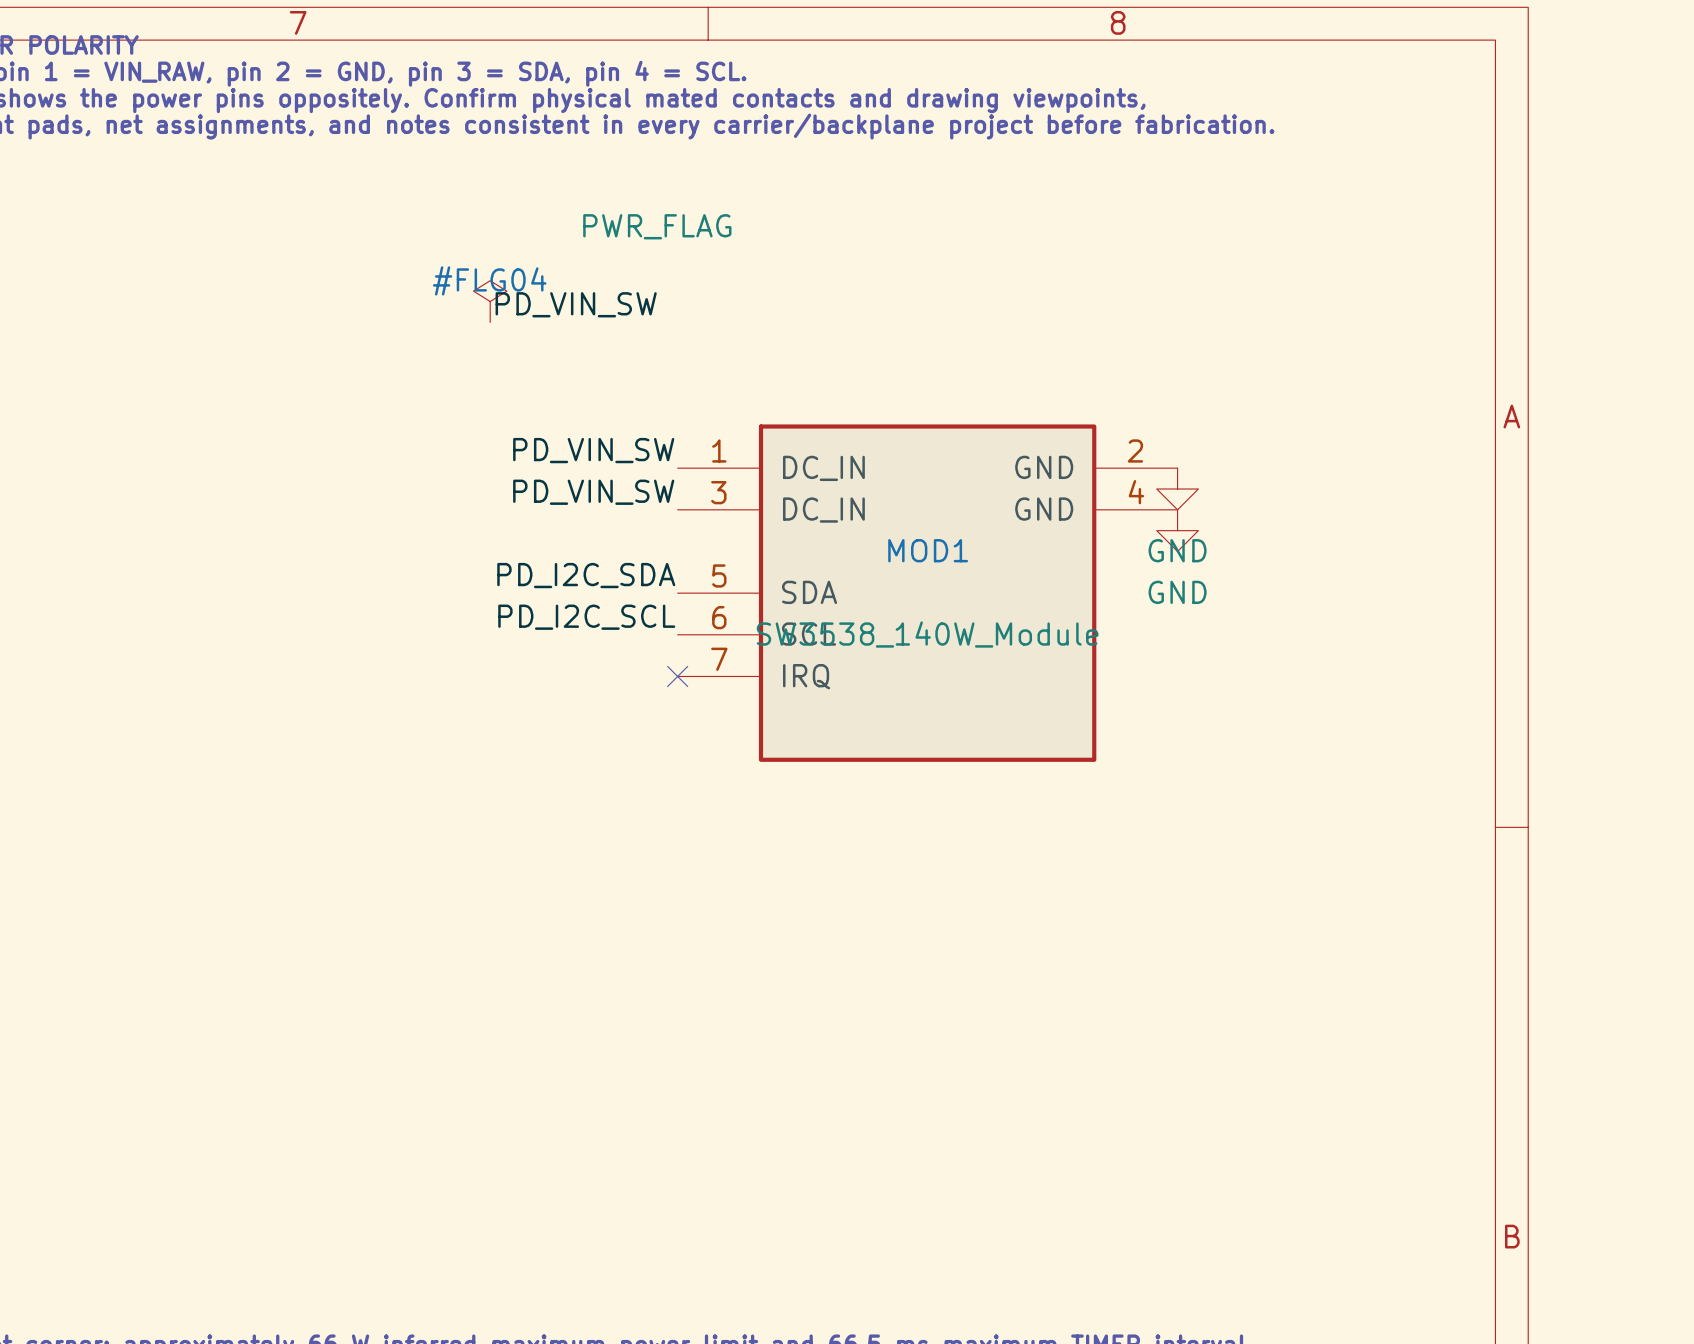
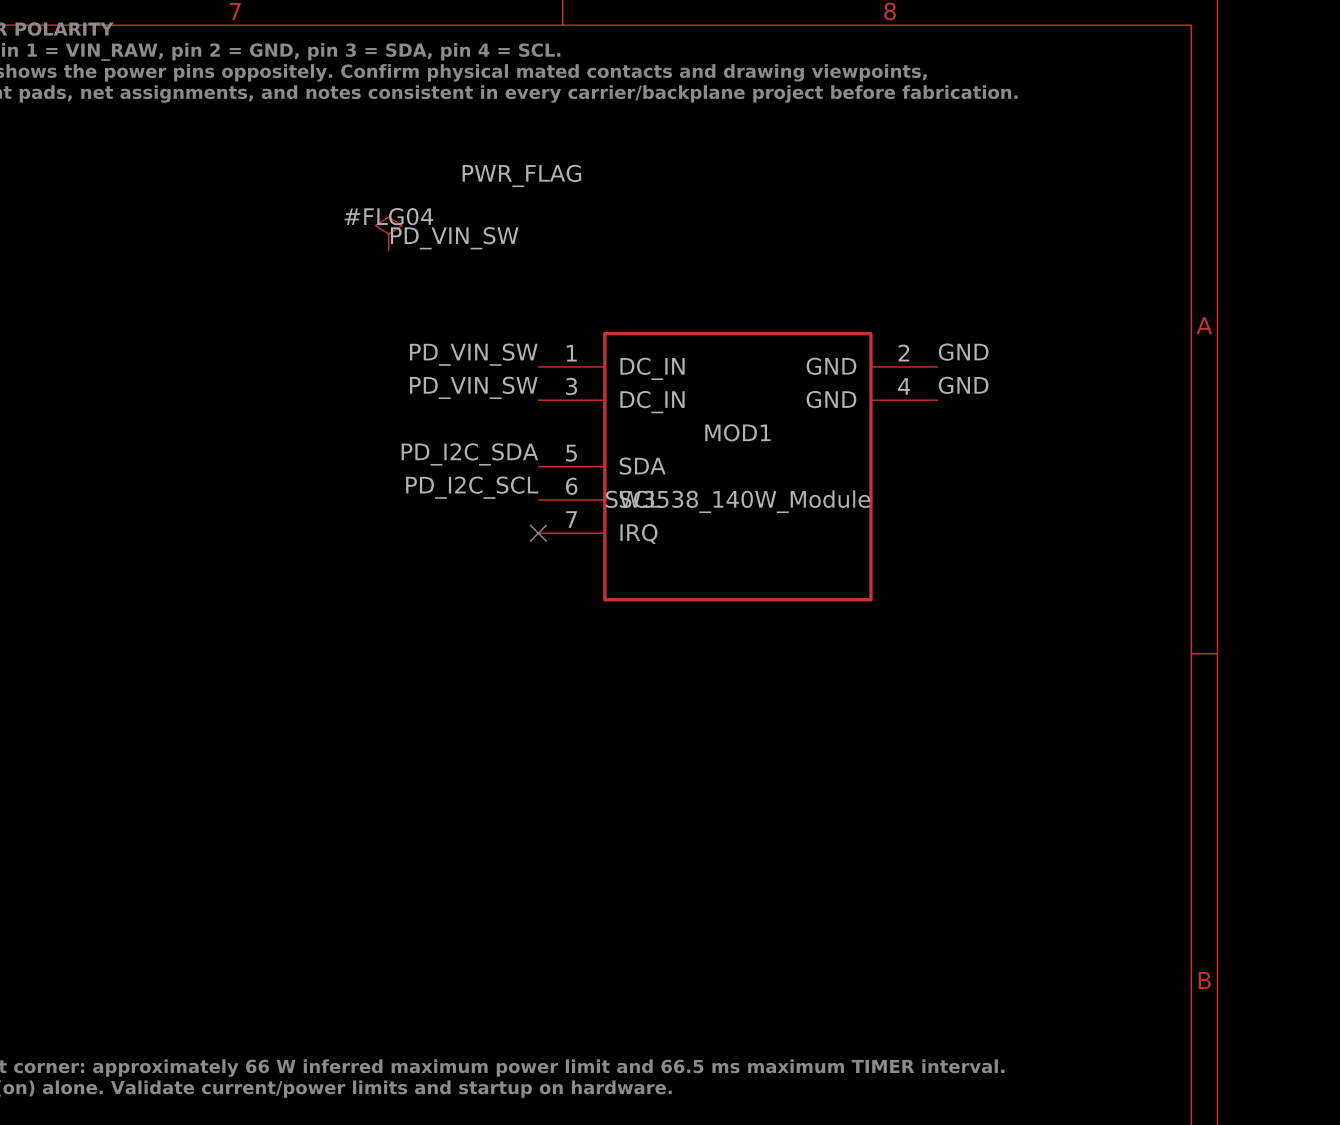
label: none -> GND (963, 352)
power symbol: GND (1177, 489) -> none
label: none -> GND (963, 385)
power symbol: GND (1177, 530) -> none

